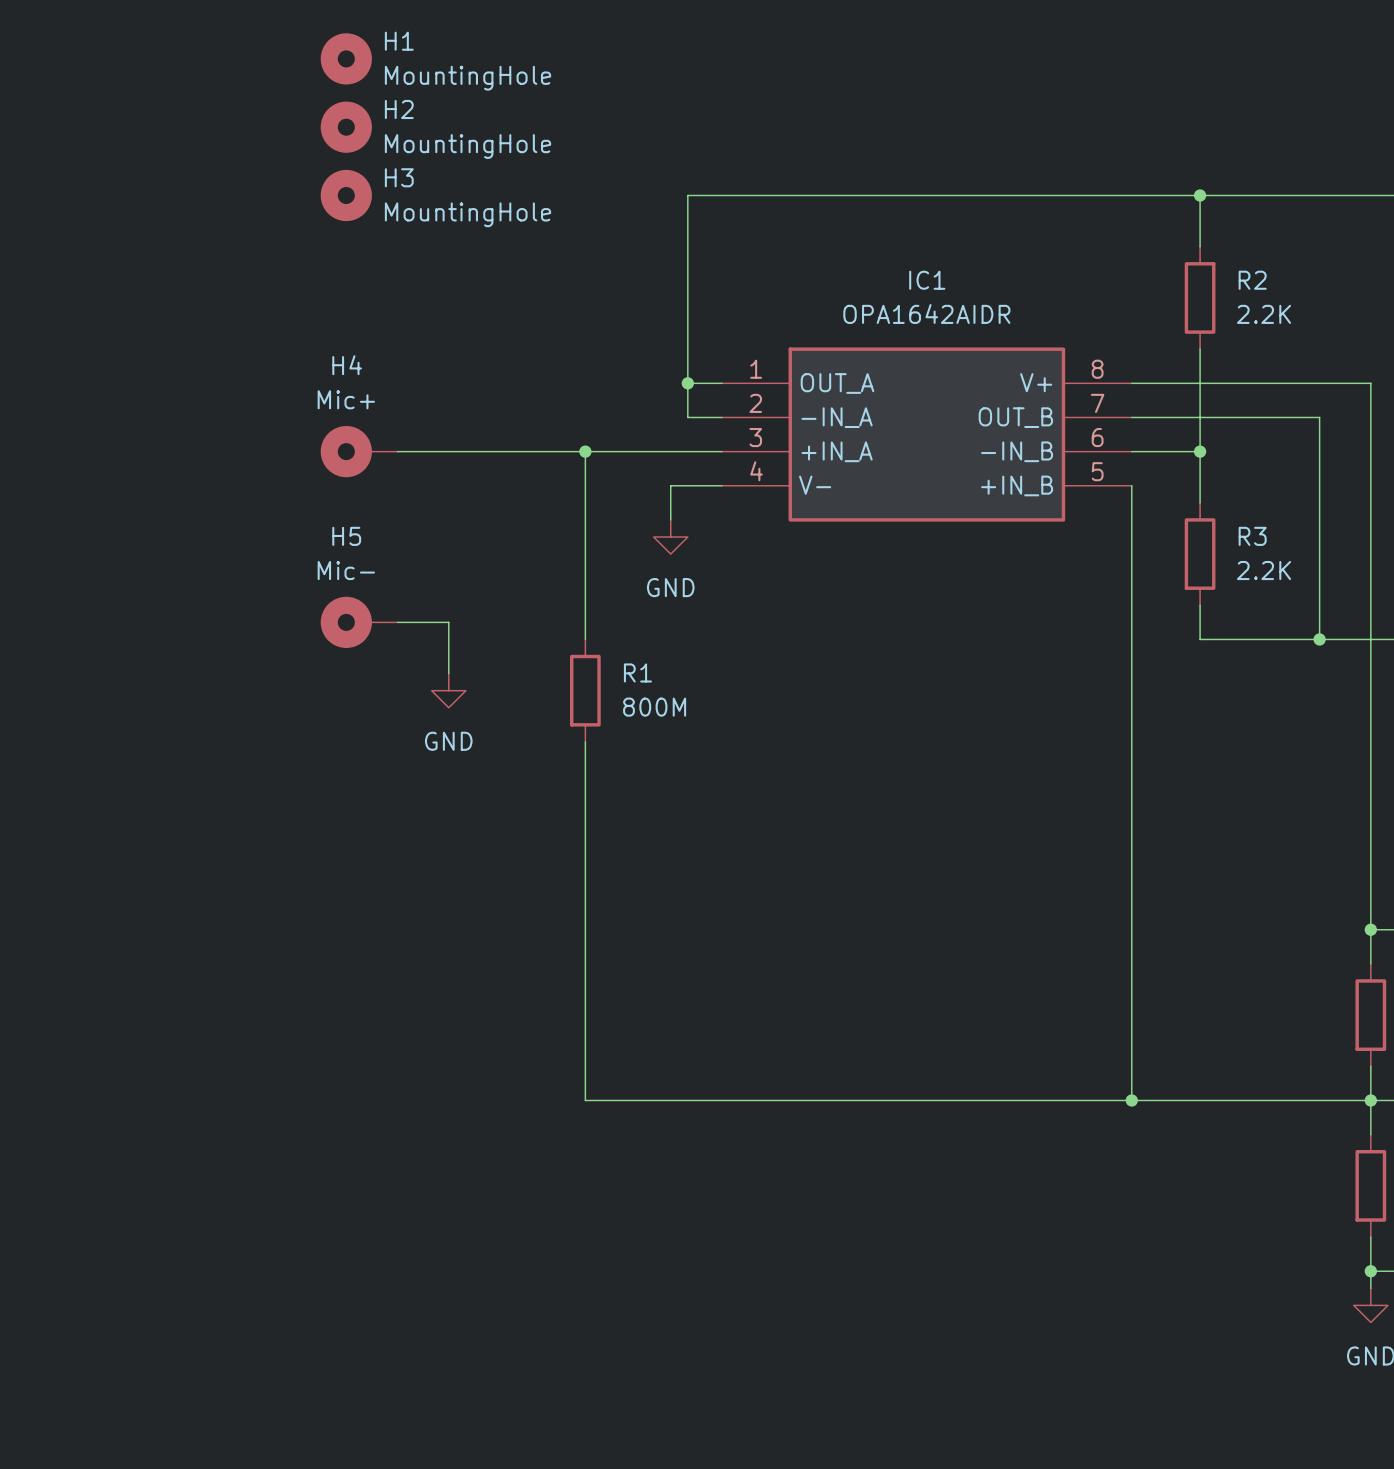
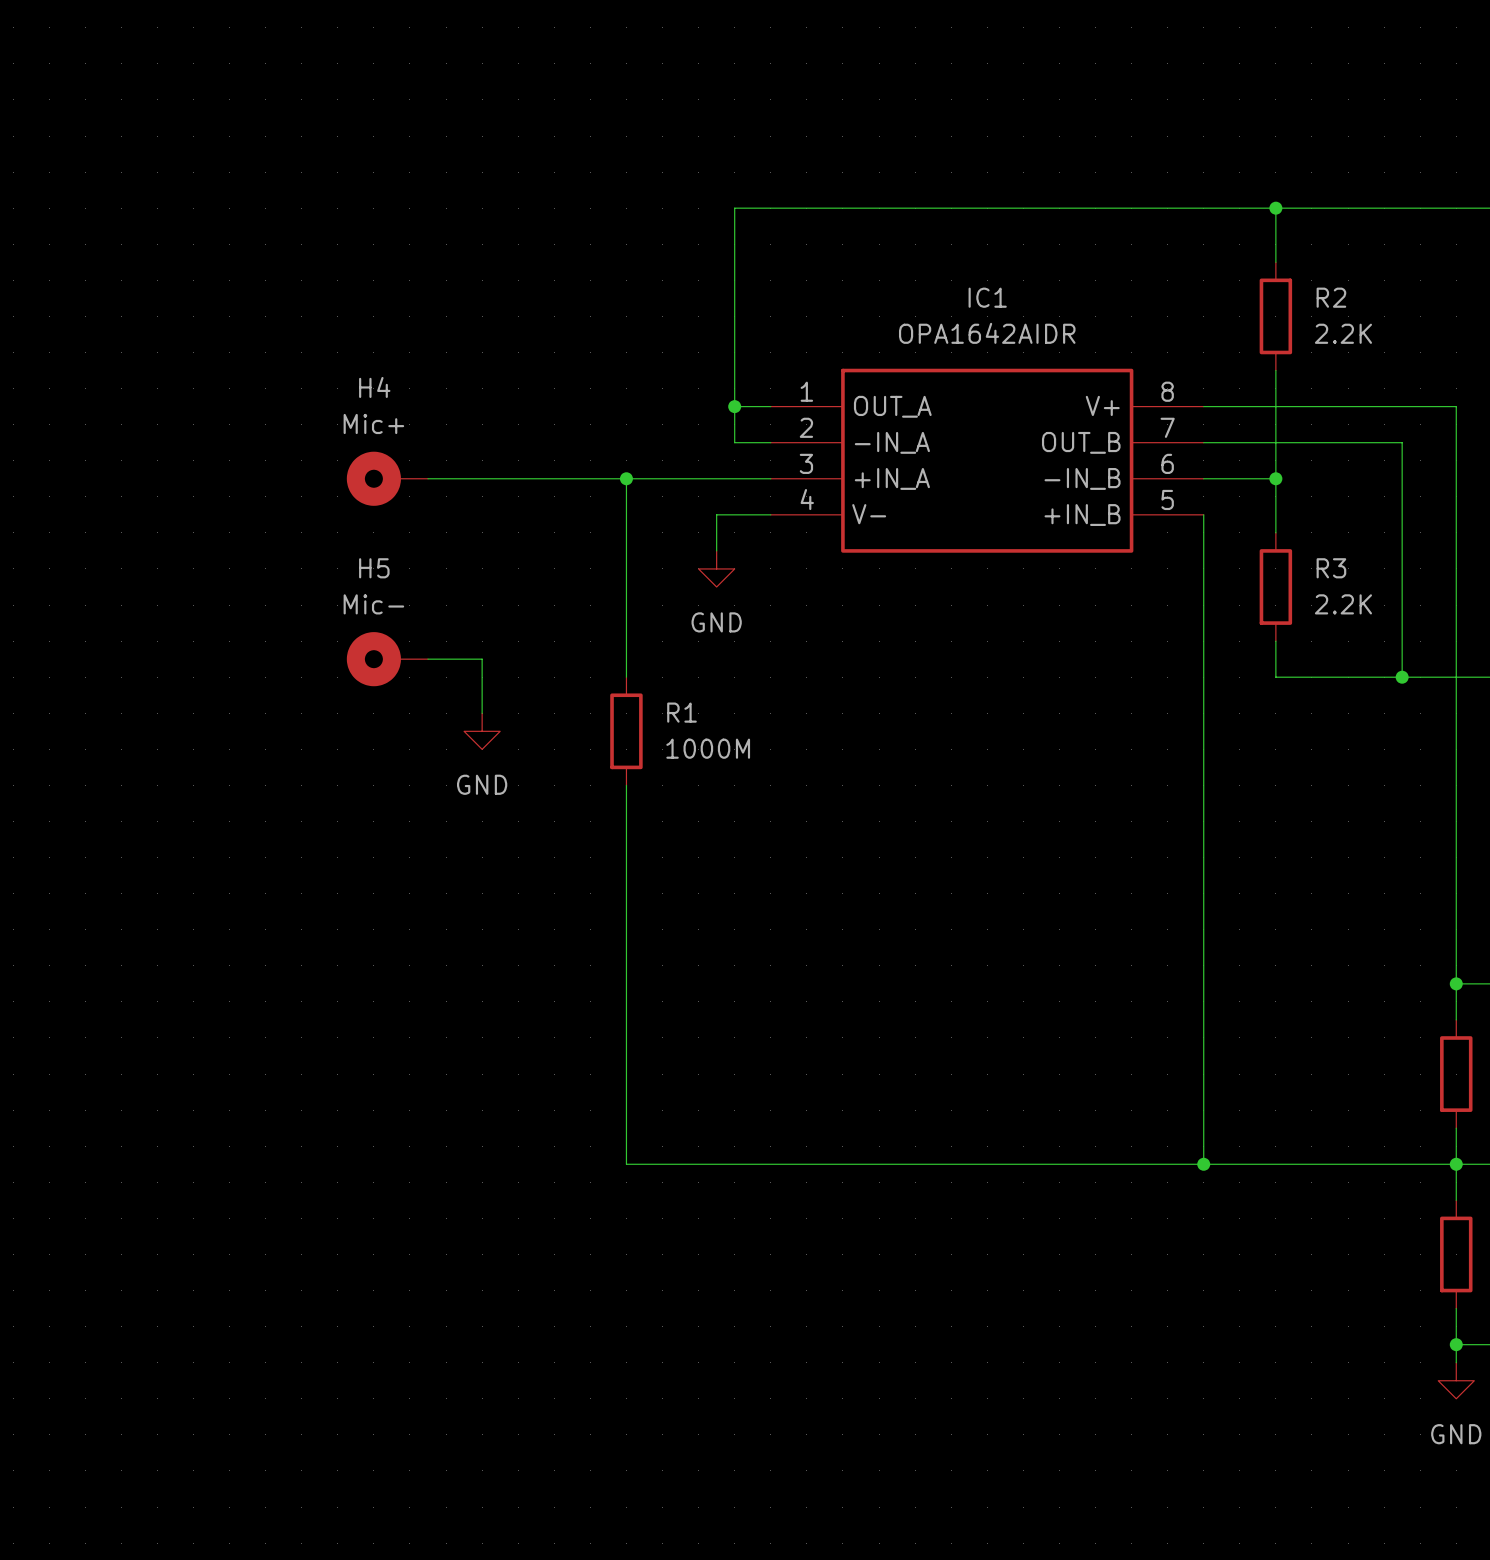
H1: MountingHole (346, 58) -> none
H2: MountingHole (346, 127) -> none
H3: MountingHole (346, 195) -> none
R1 value: 800M (654, 707) -> 1000M (708, 748)

